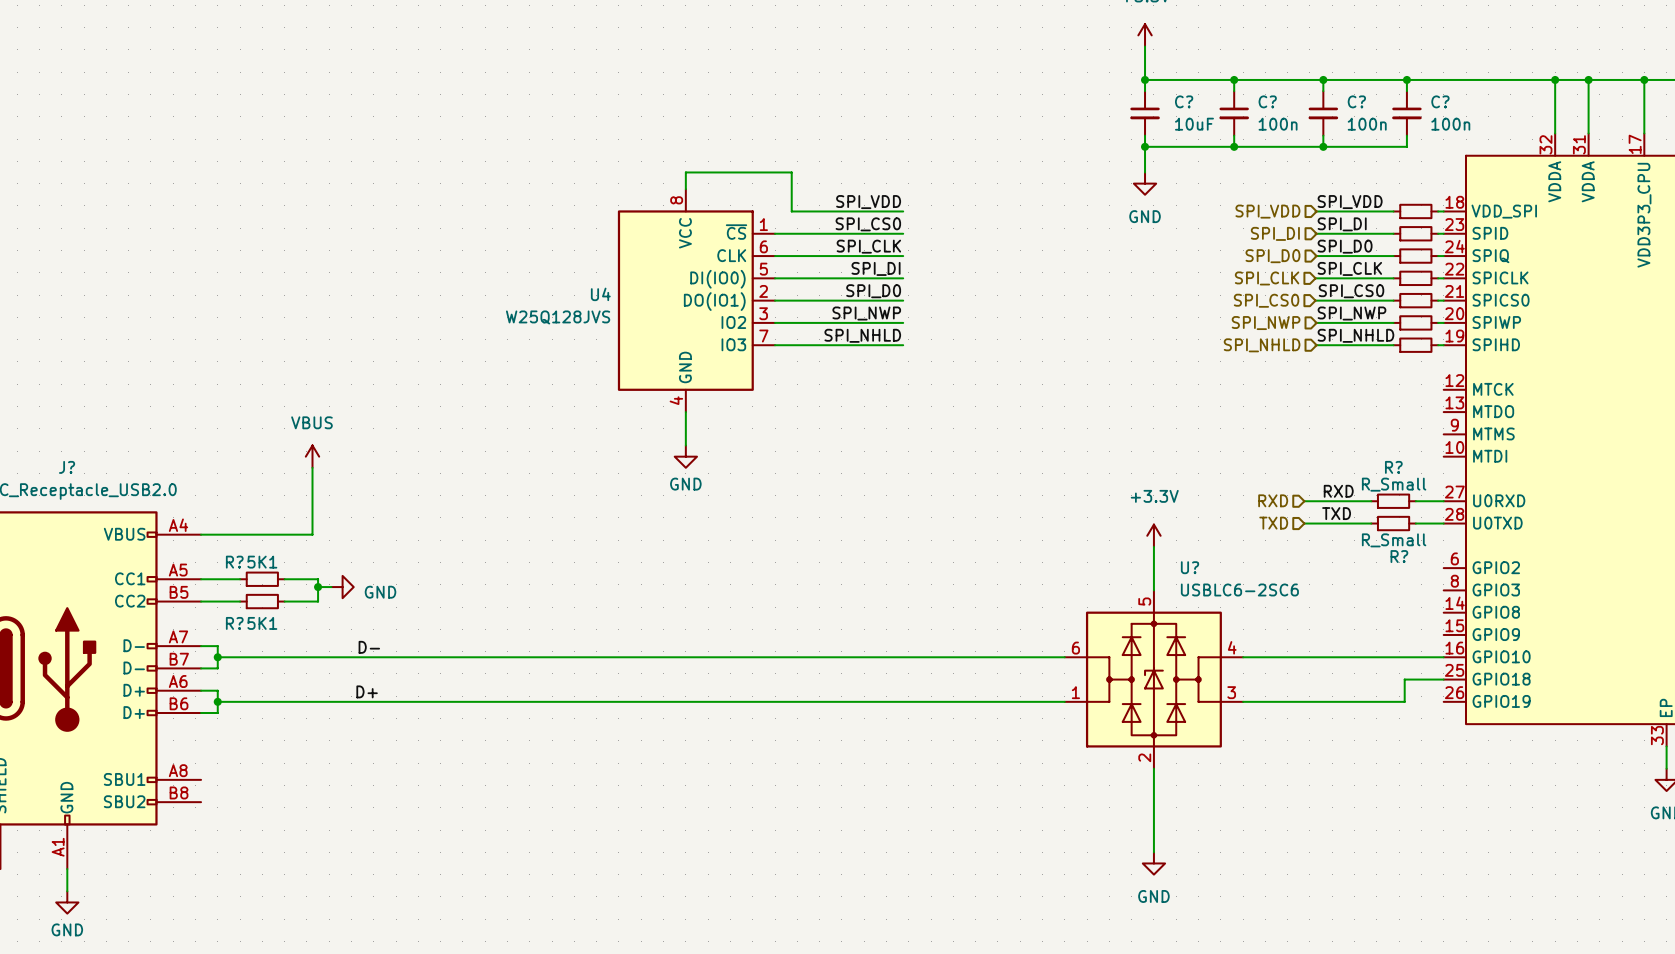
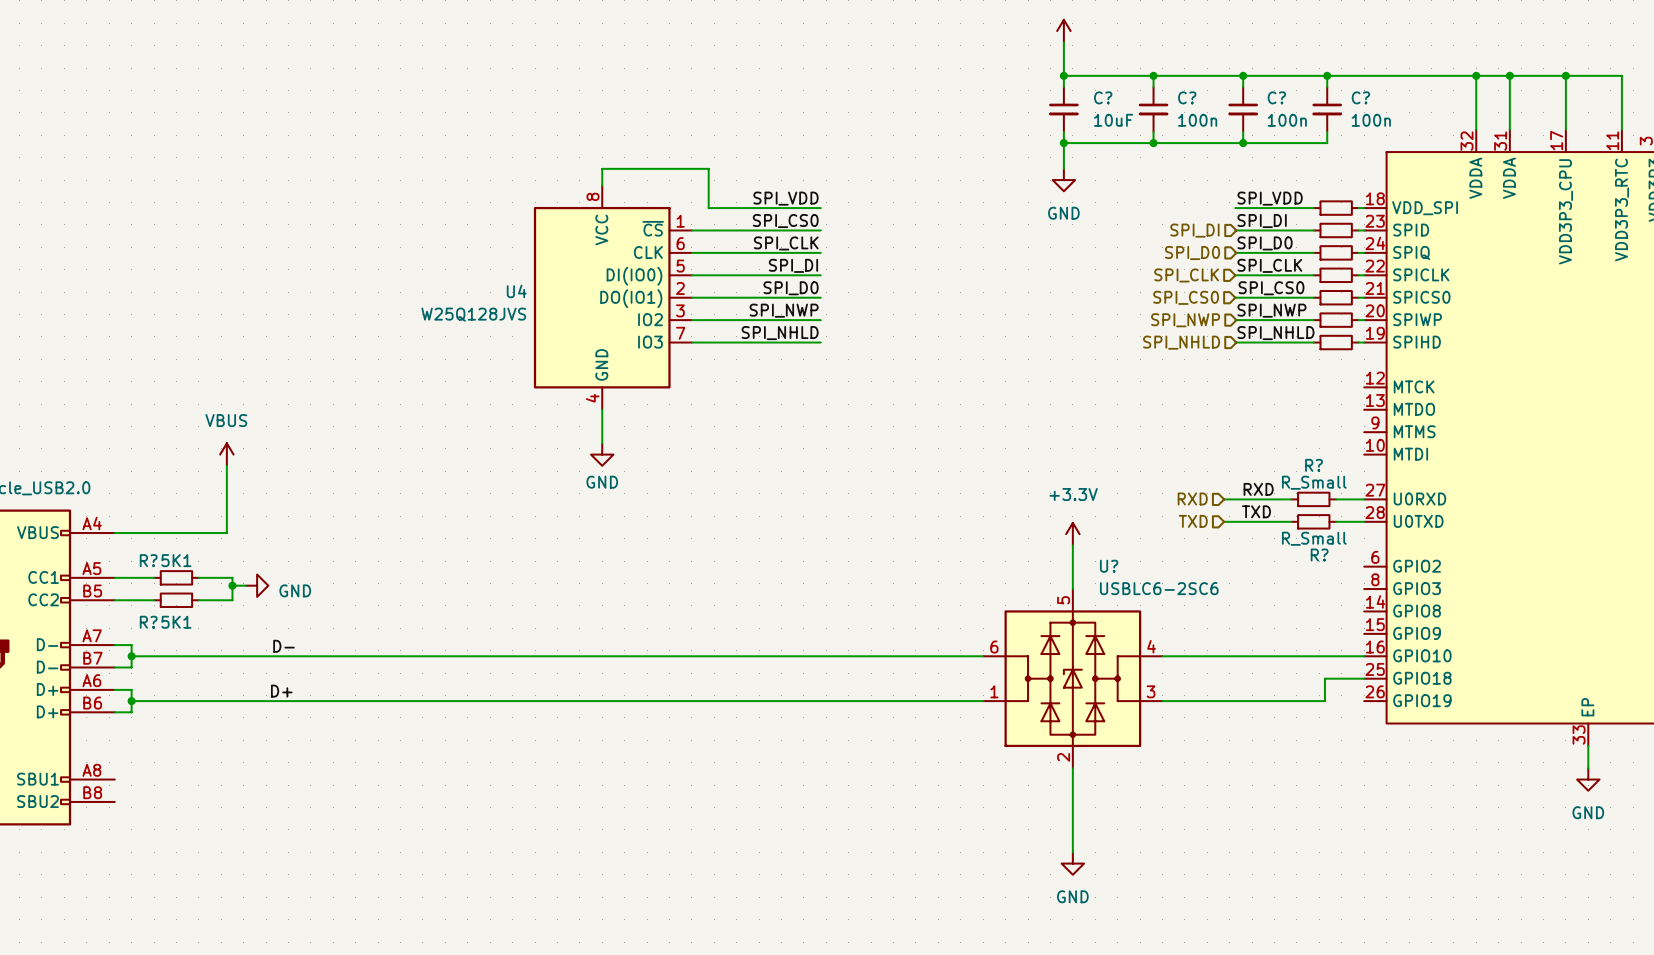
hierarchical label: SPI_VDD (1267, 211) -> none

